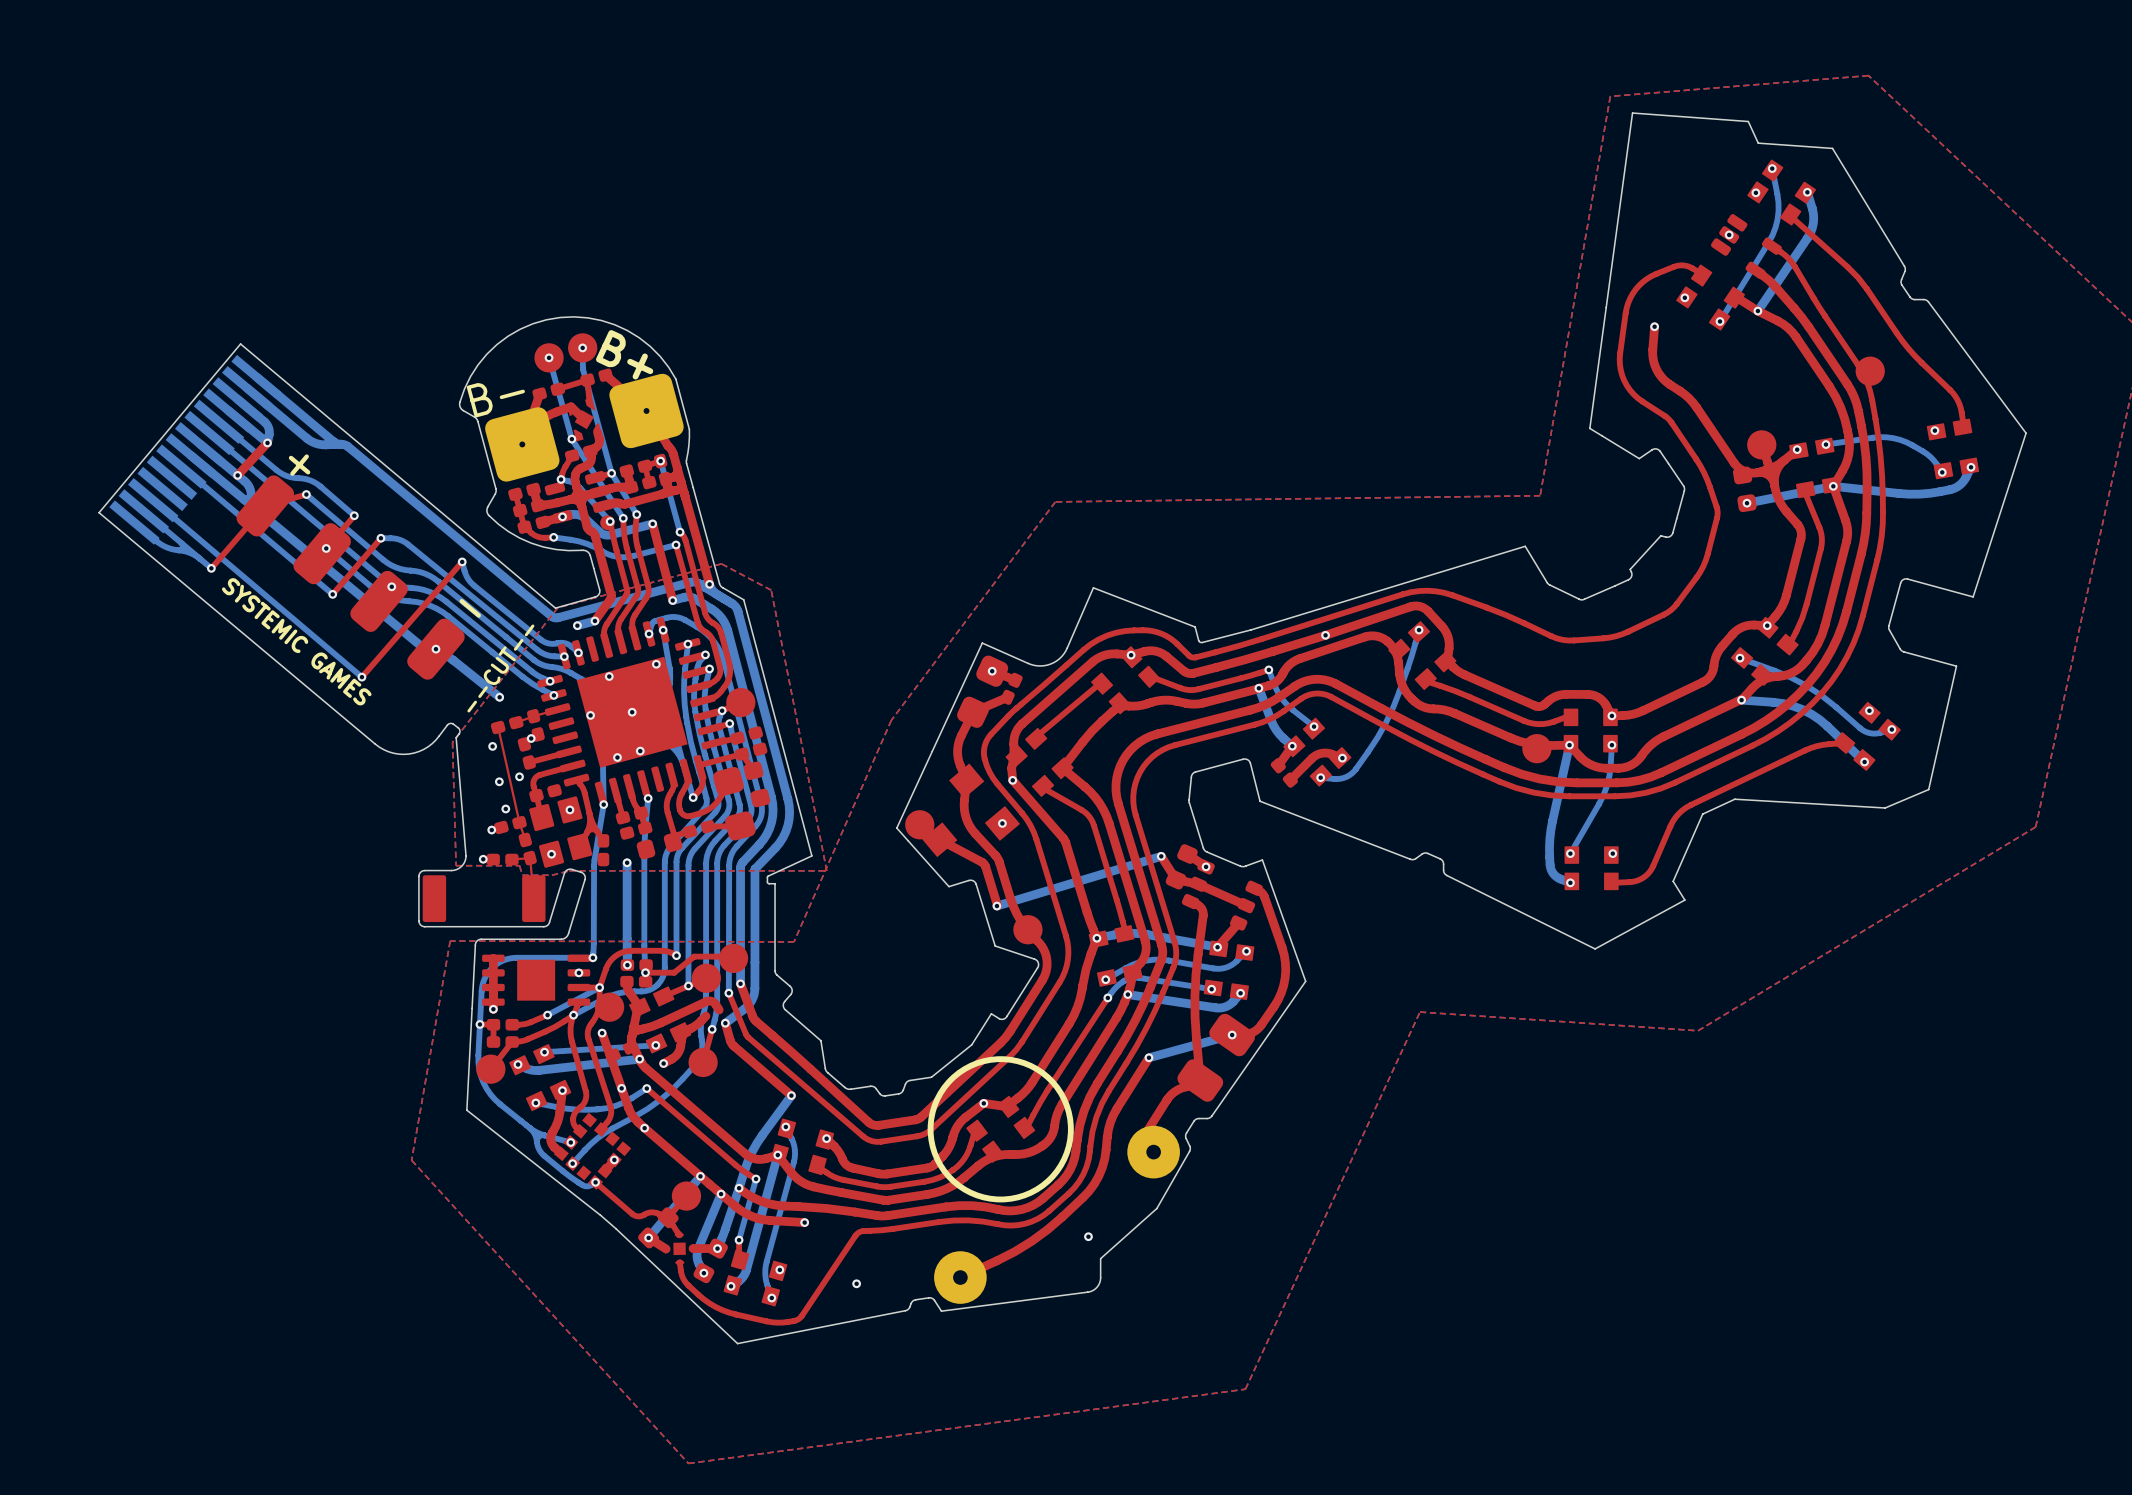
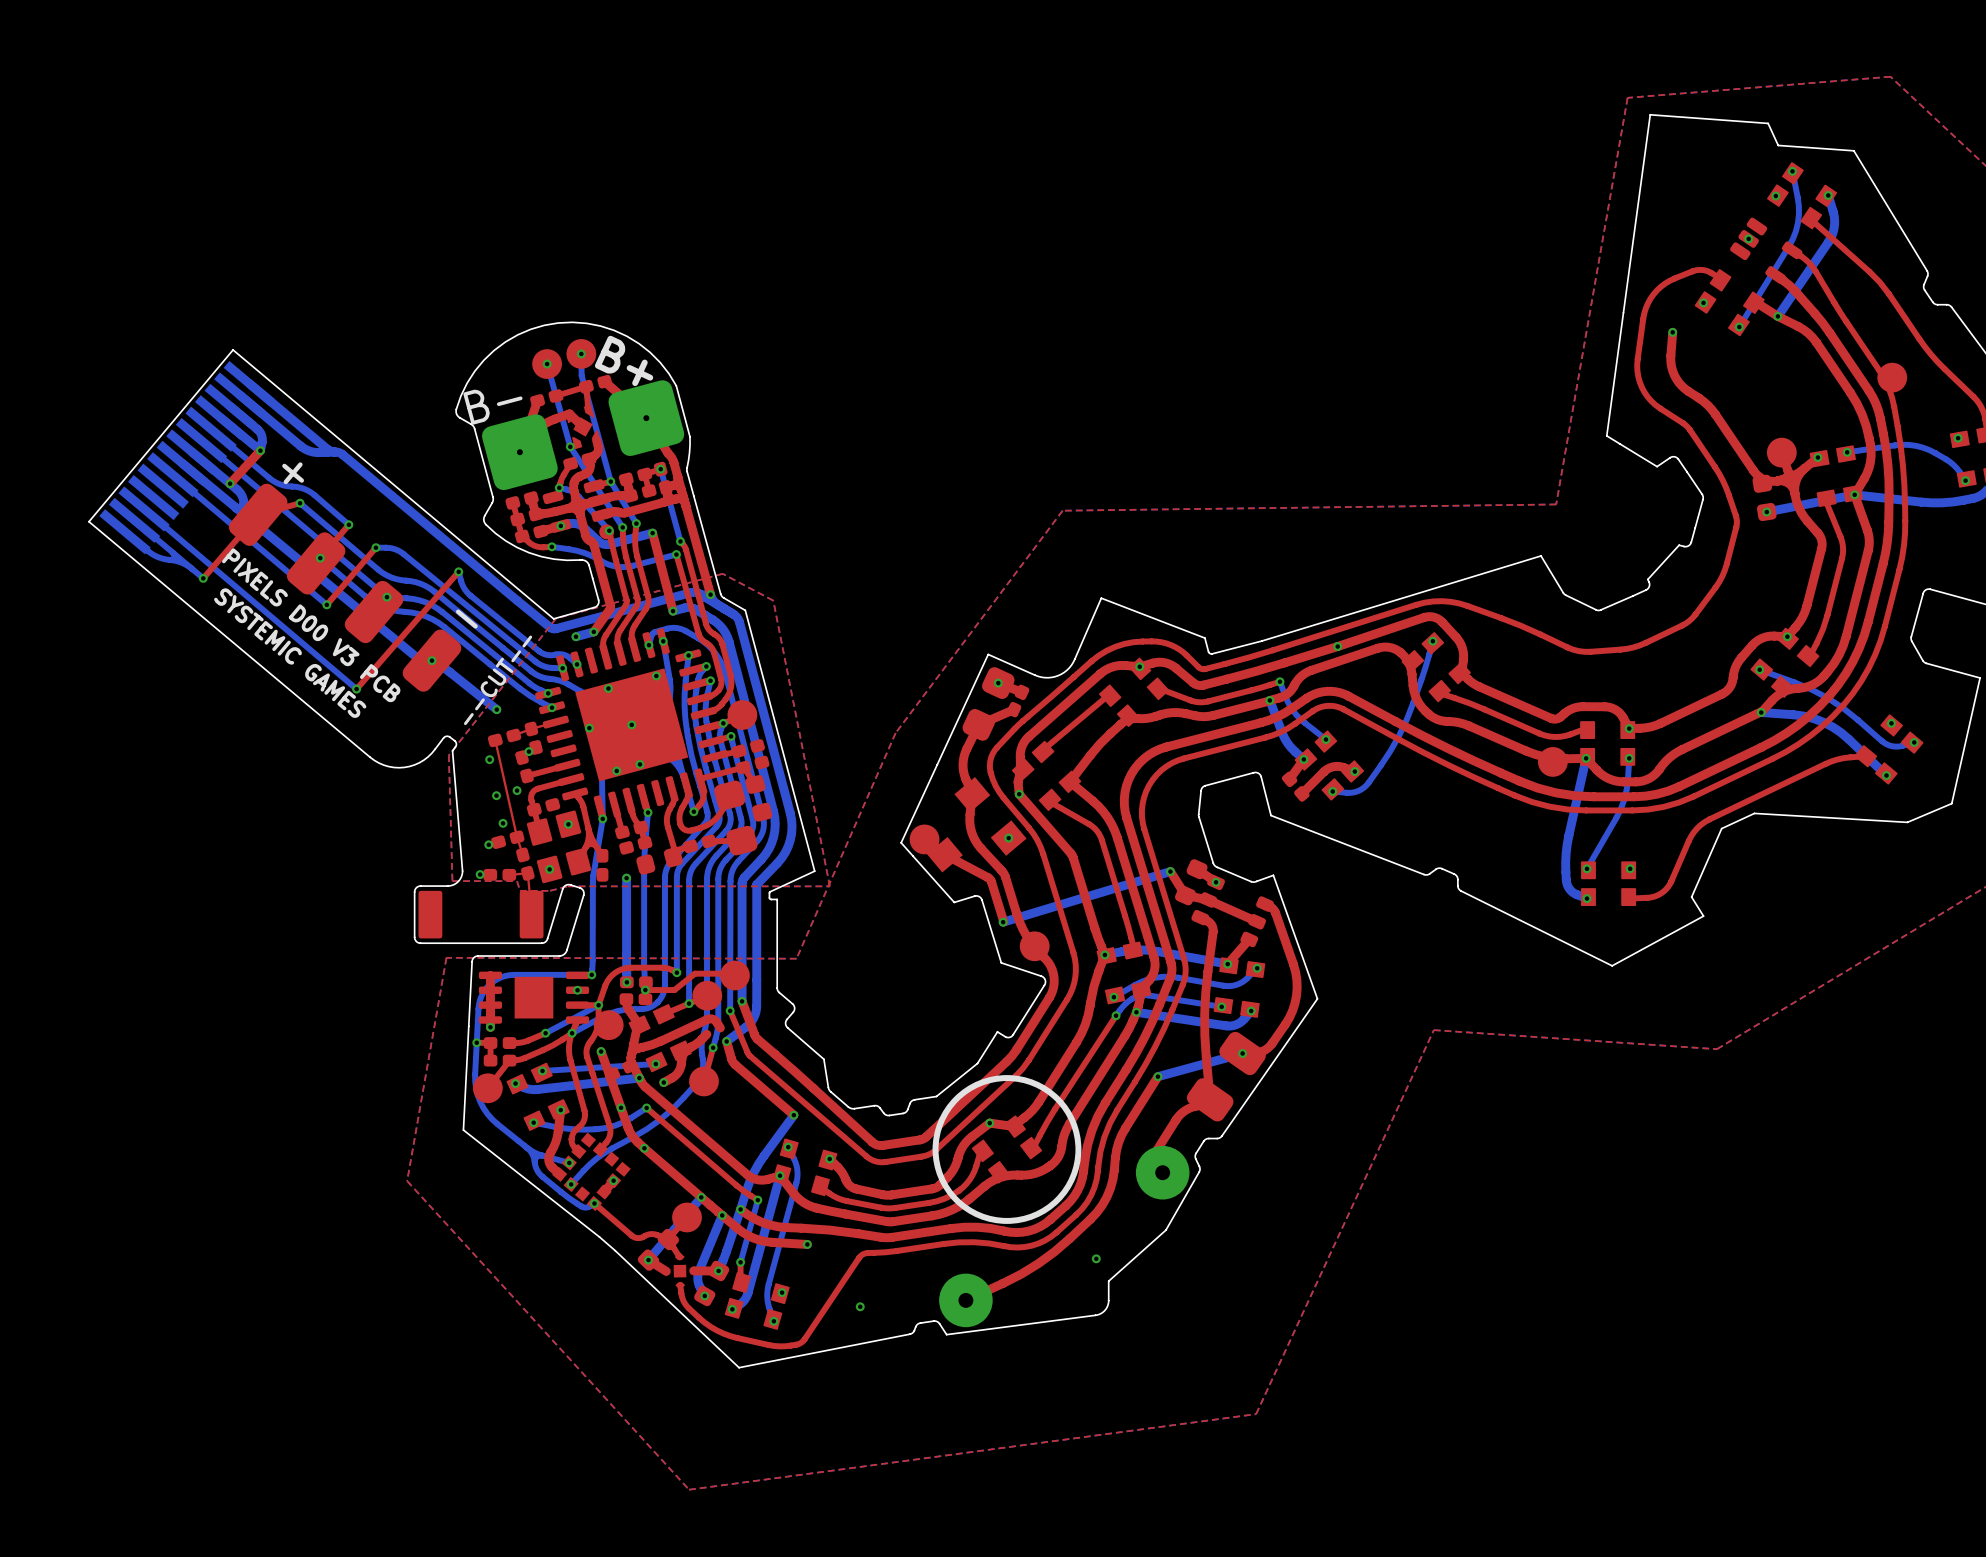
text: none -> PIXELS D00 V3 PCB (311, 625)

